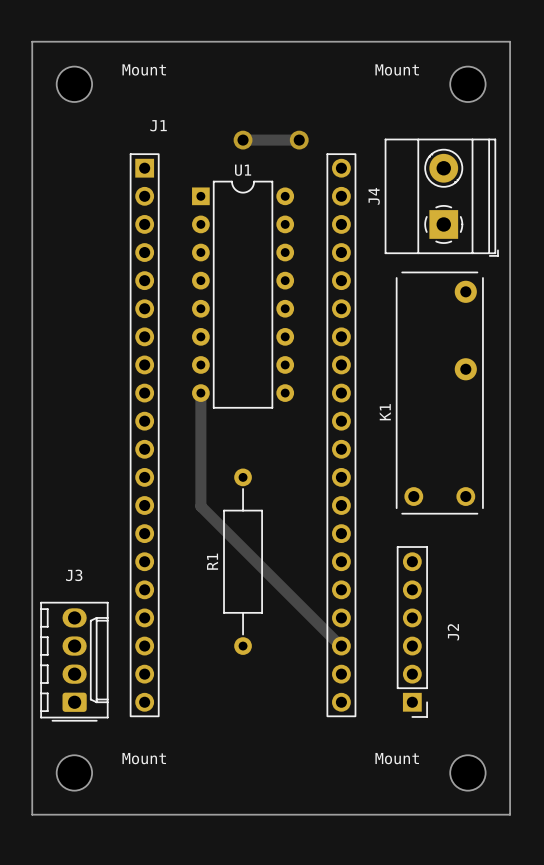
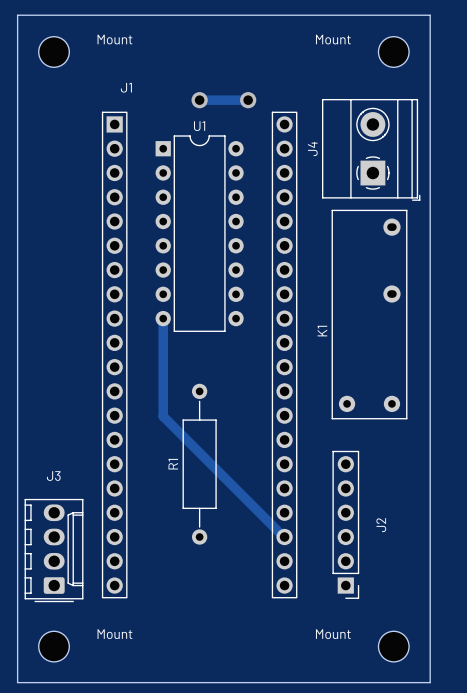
K1 footprint: [395, 271, 484, 515] -> [331, 209, 408, 420]

